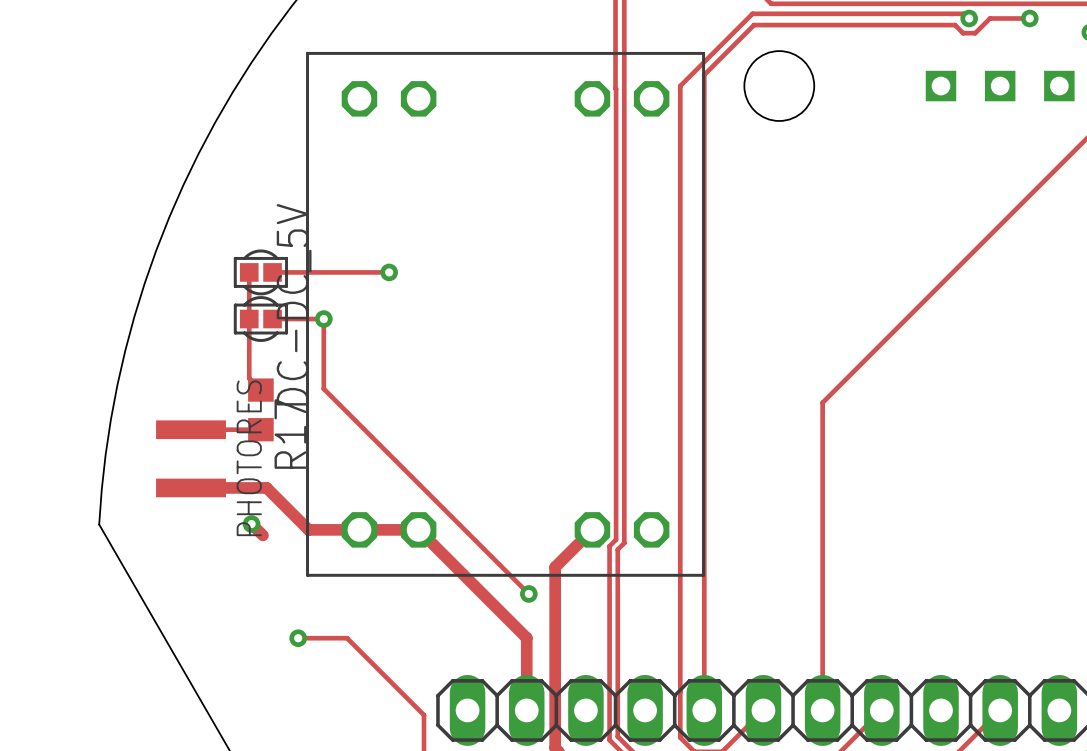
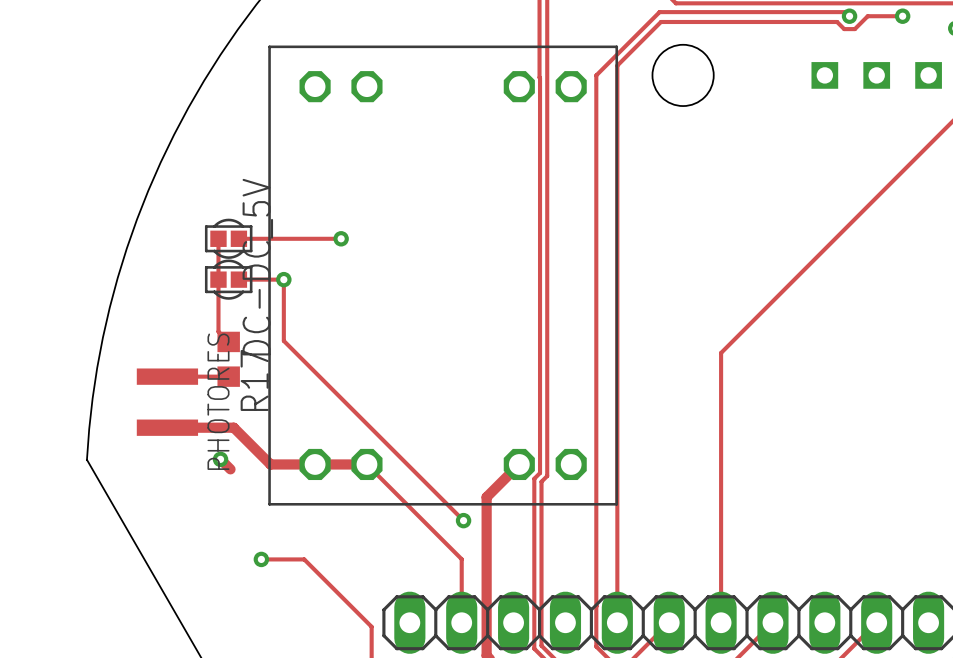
track width: thick (418, 529) (526, 637) (526, 710) -> thin (366, 464) (461, 559) (461, 622)

